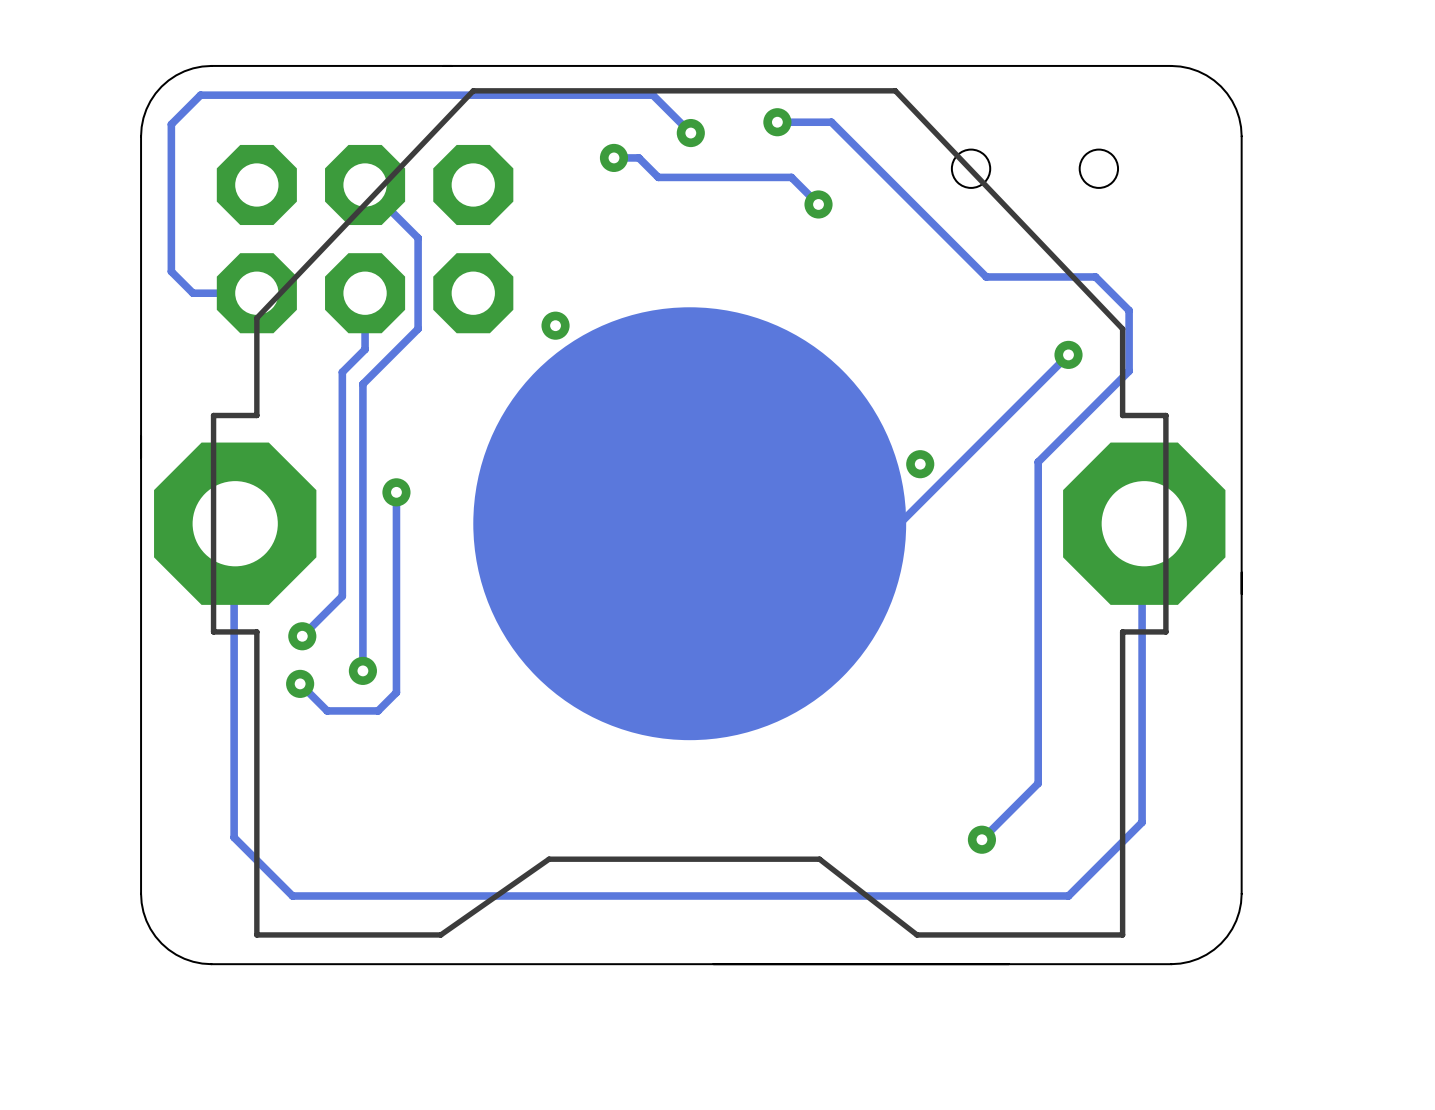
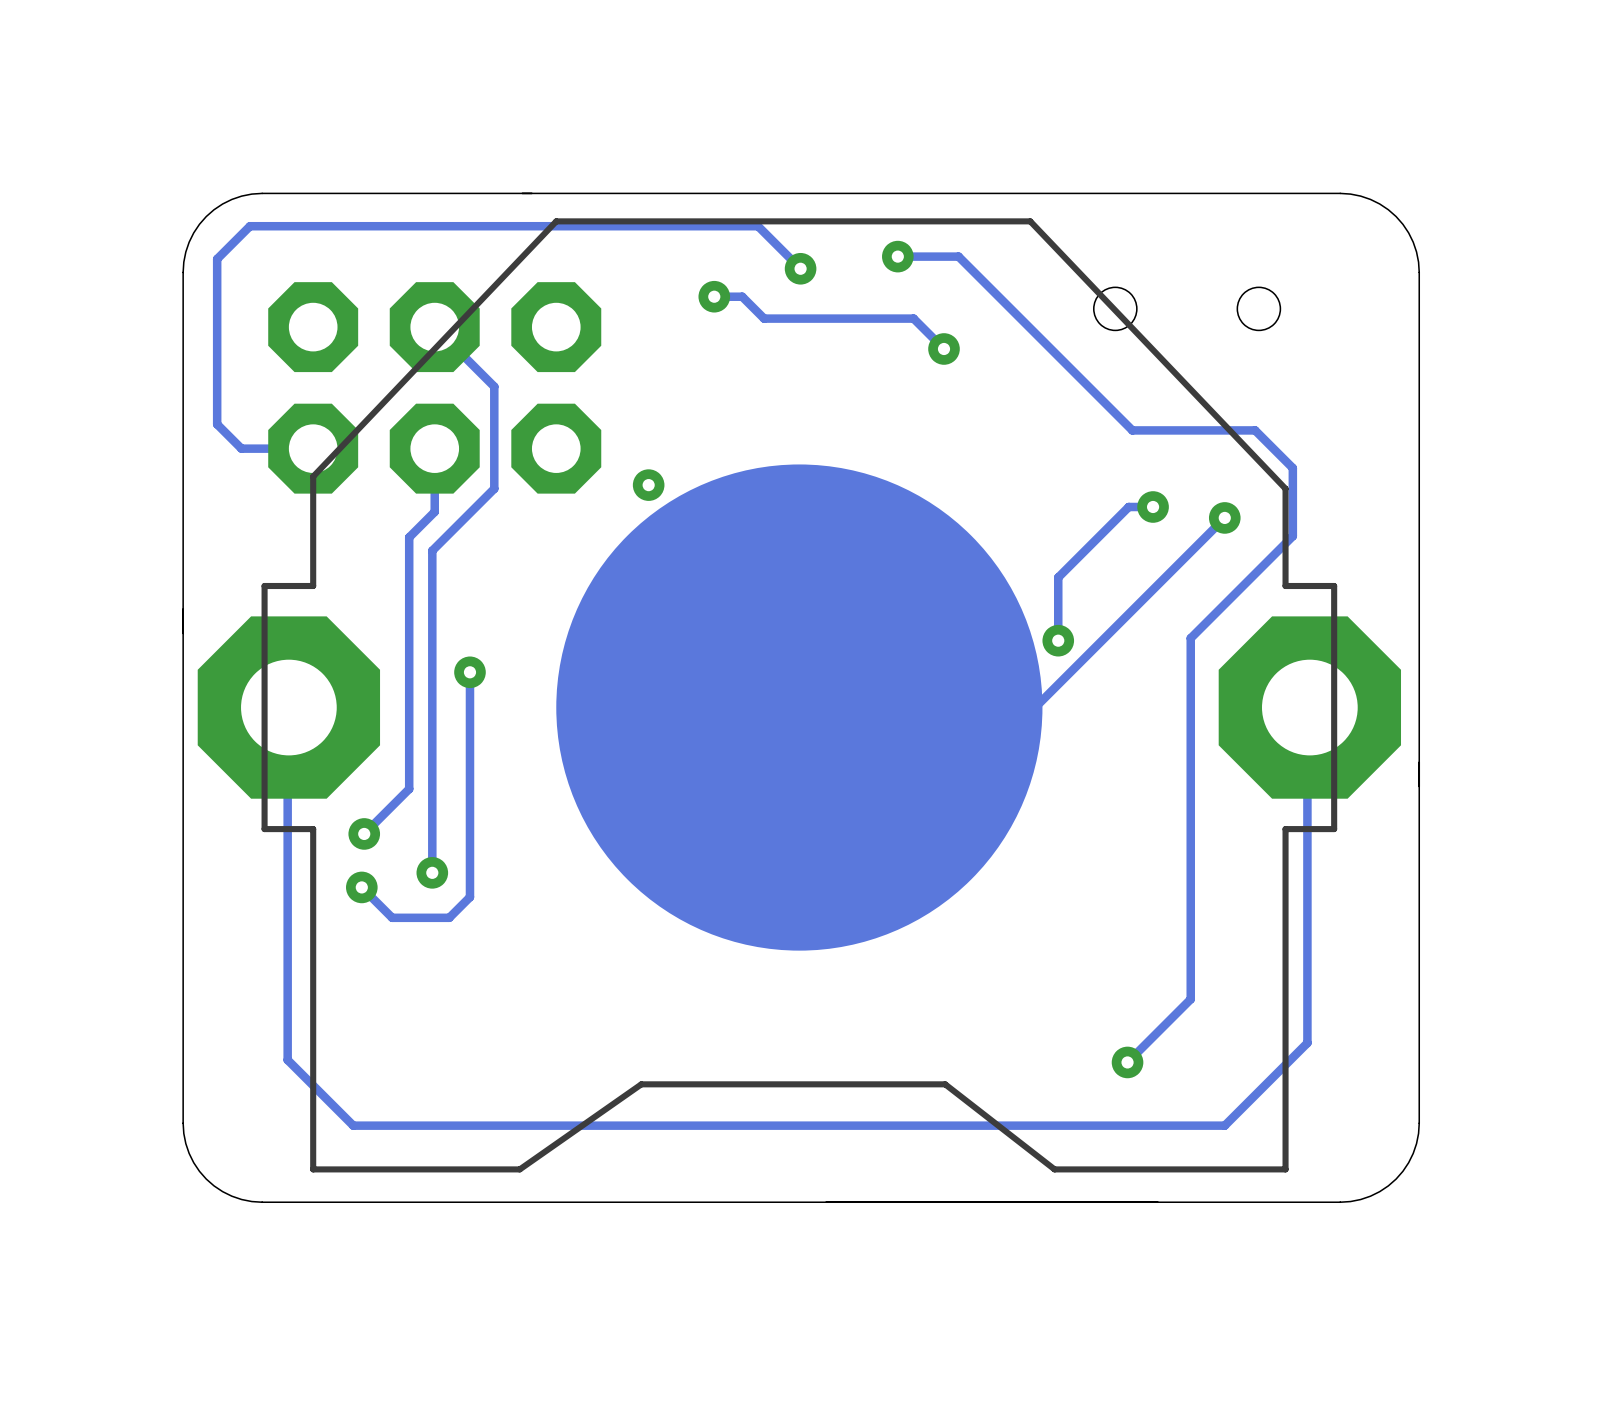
track: none -> (1153, 506) (1128, 506) (1058, 577) (1058, 640)
via: none -> (1153, 506)

